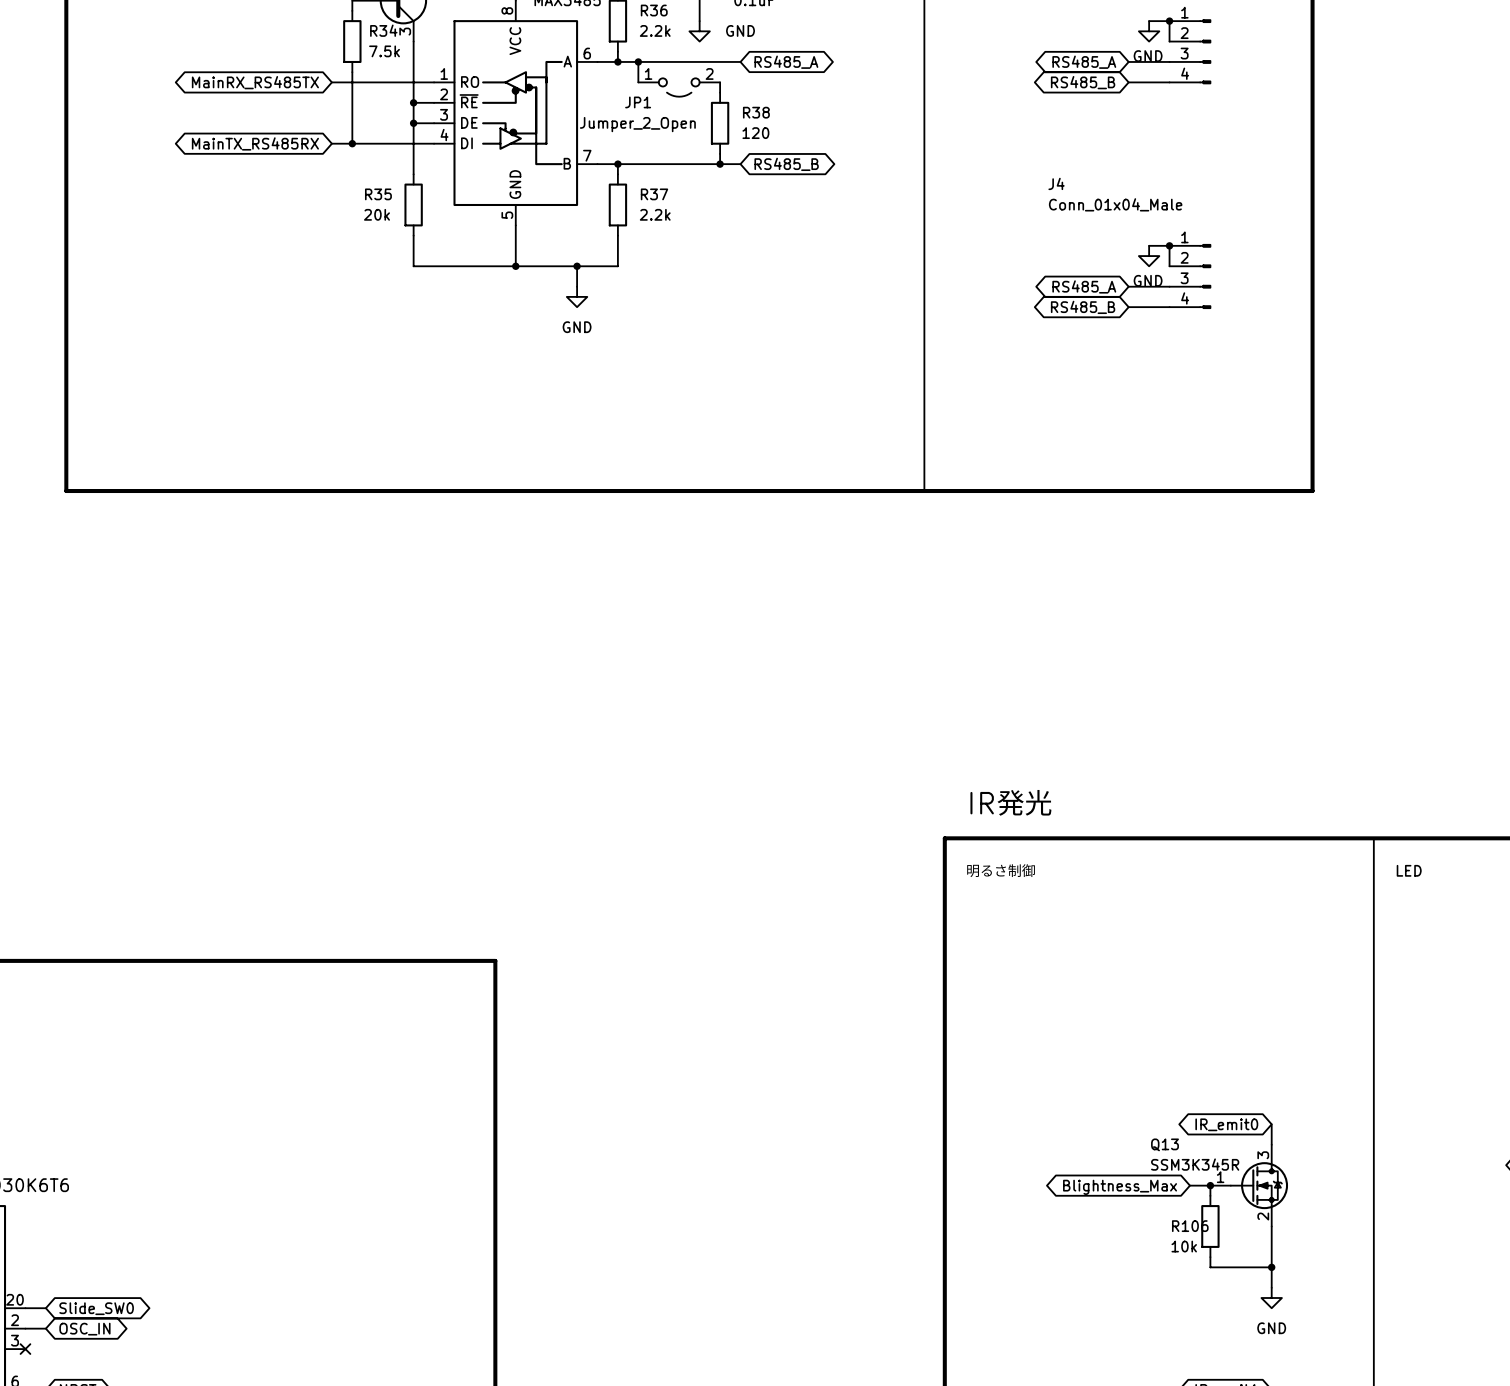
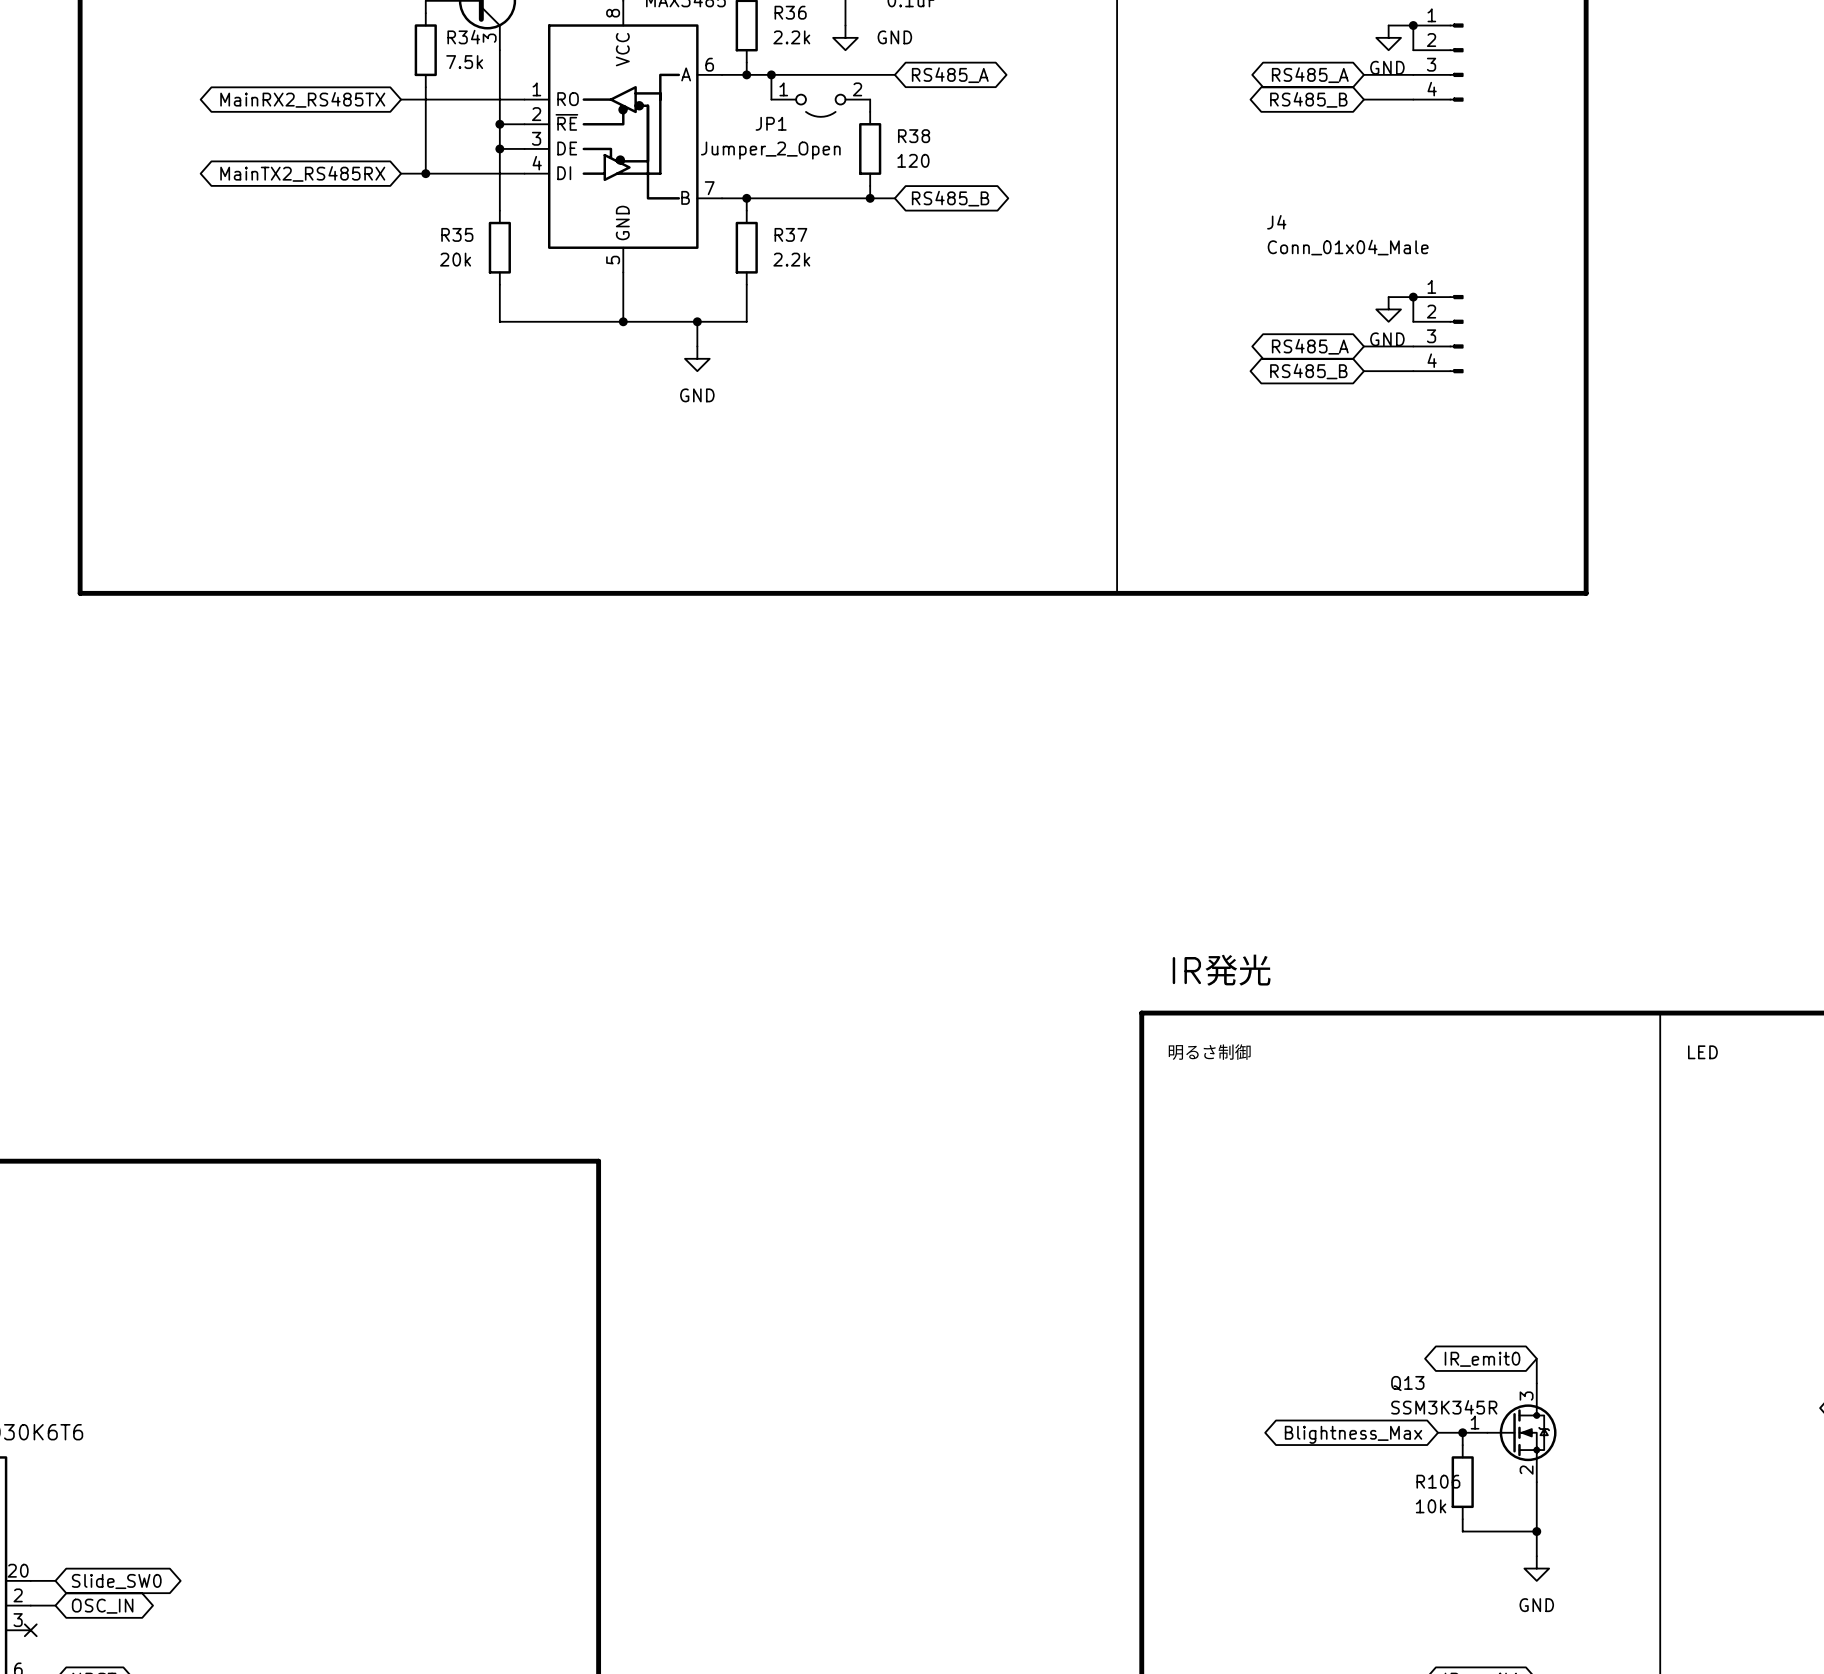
global label: MainRX_RS485TX (255, 82) -> MainRX2_RS485TX (302, 99)
global label: MainTX_RS485RX (255, 143) -> MainTX2_RS485RX (302, 173)

